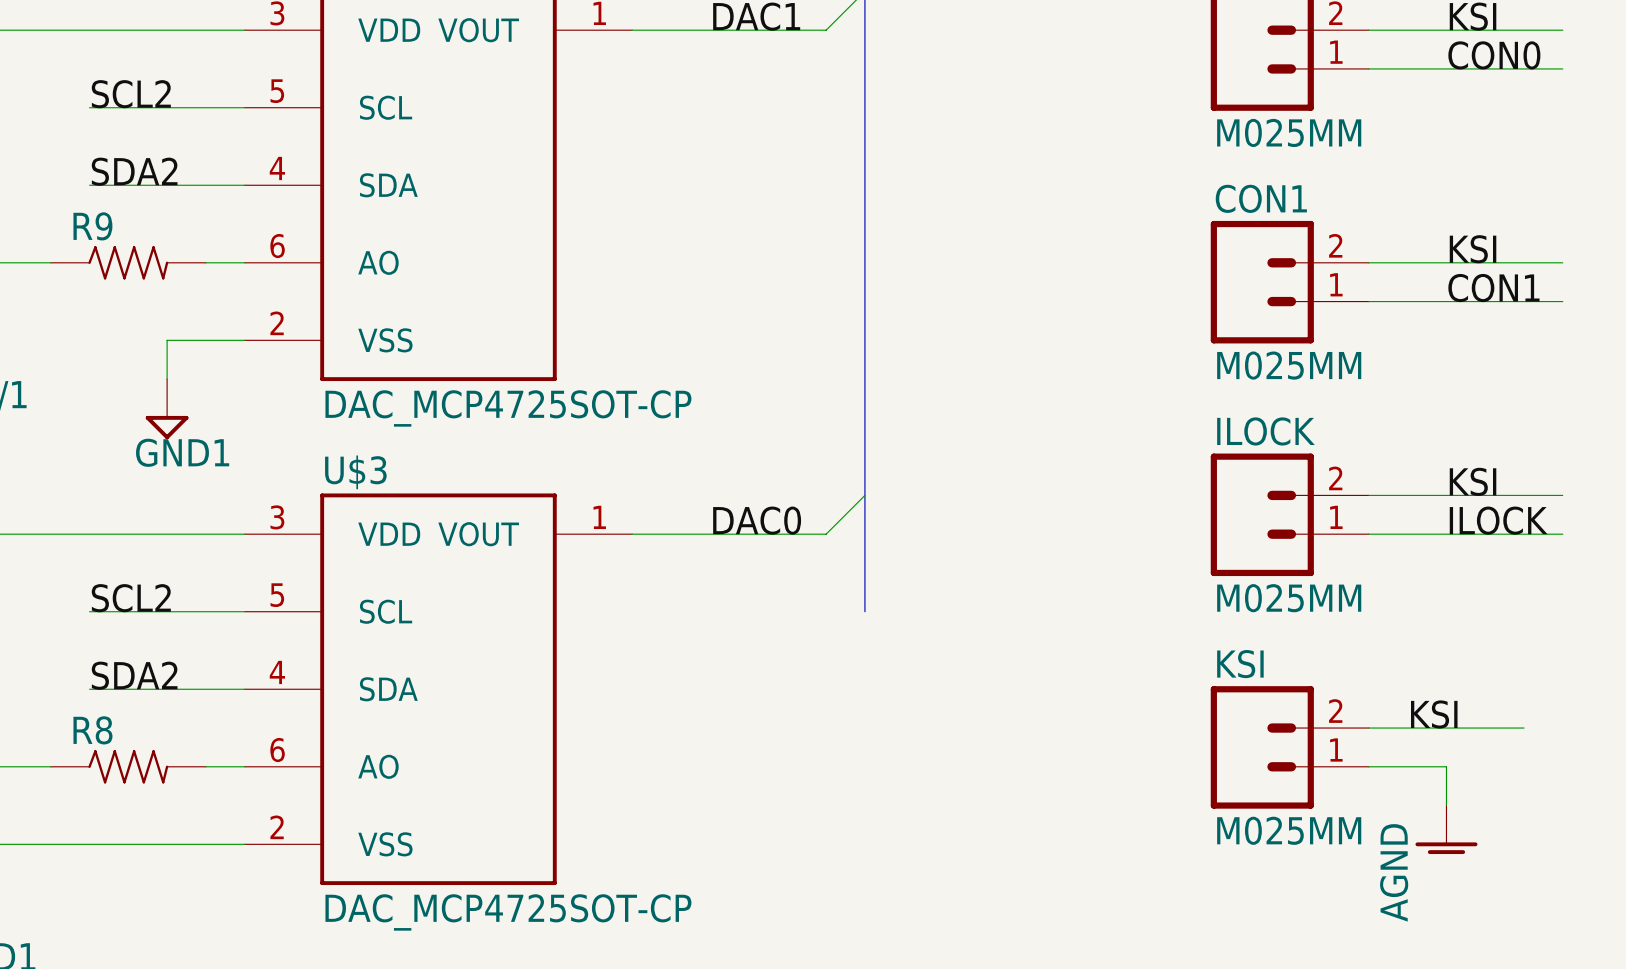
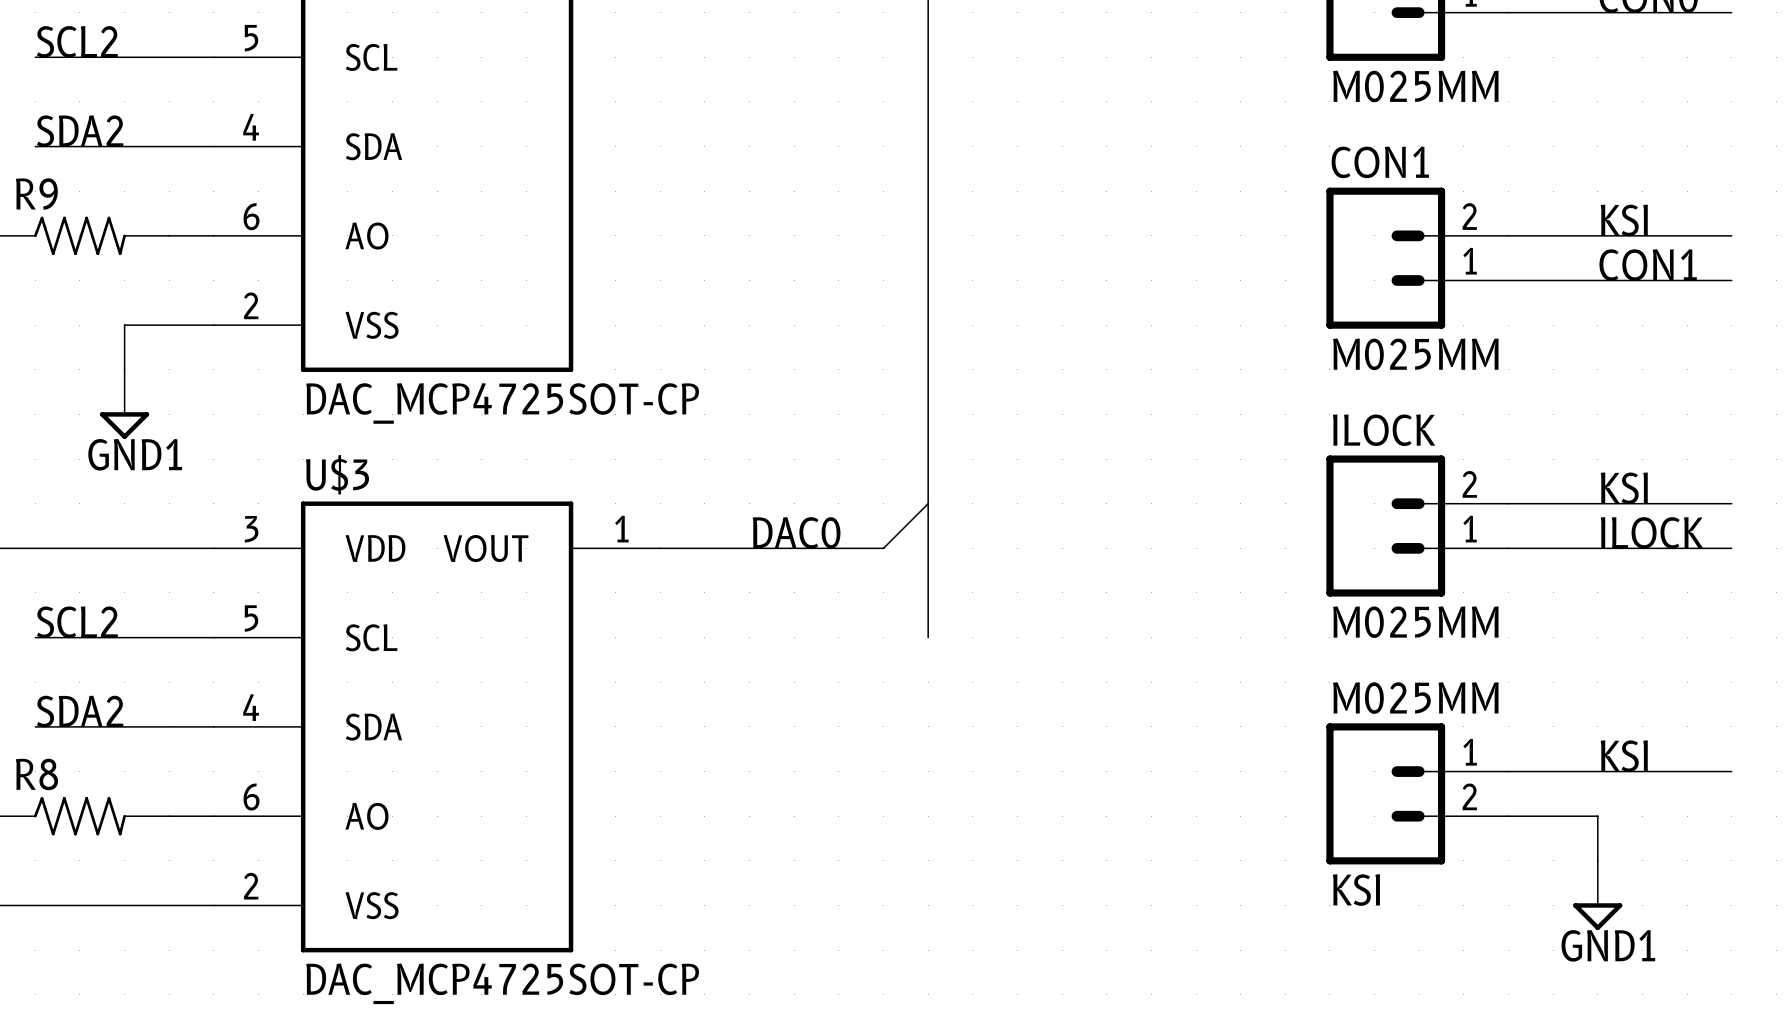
label position: KSI (1434, 714) -> KSI (1624, 756)
wire: none -> (1687, 771) (1731, 771)
KSI flip: as is (1262, 747) -> up-down (1385, 793)
power symbol: AGND (1446, 829) -> GND1 (1597, 895)

